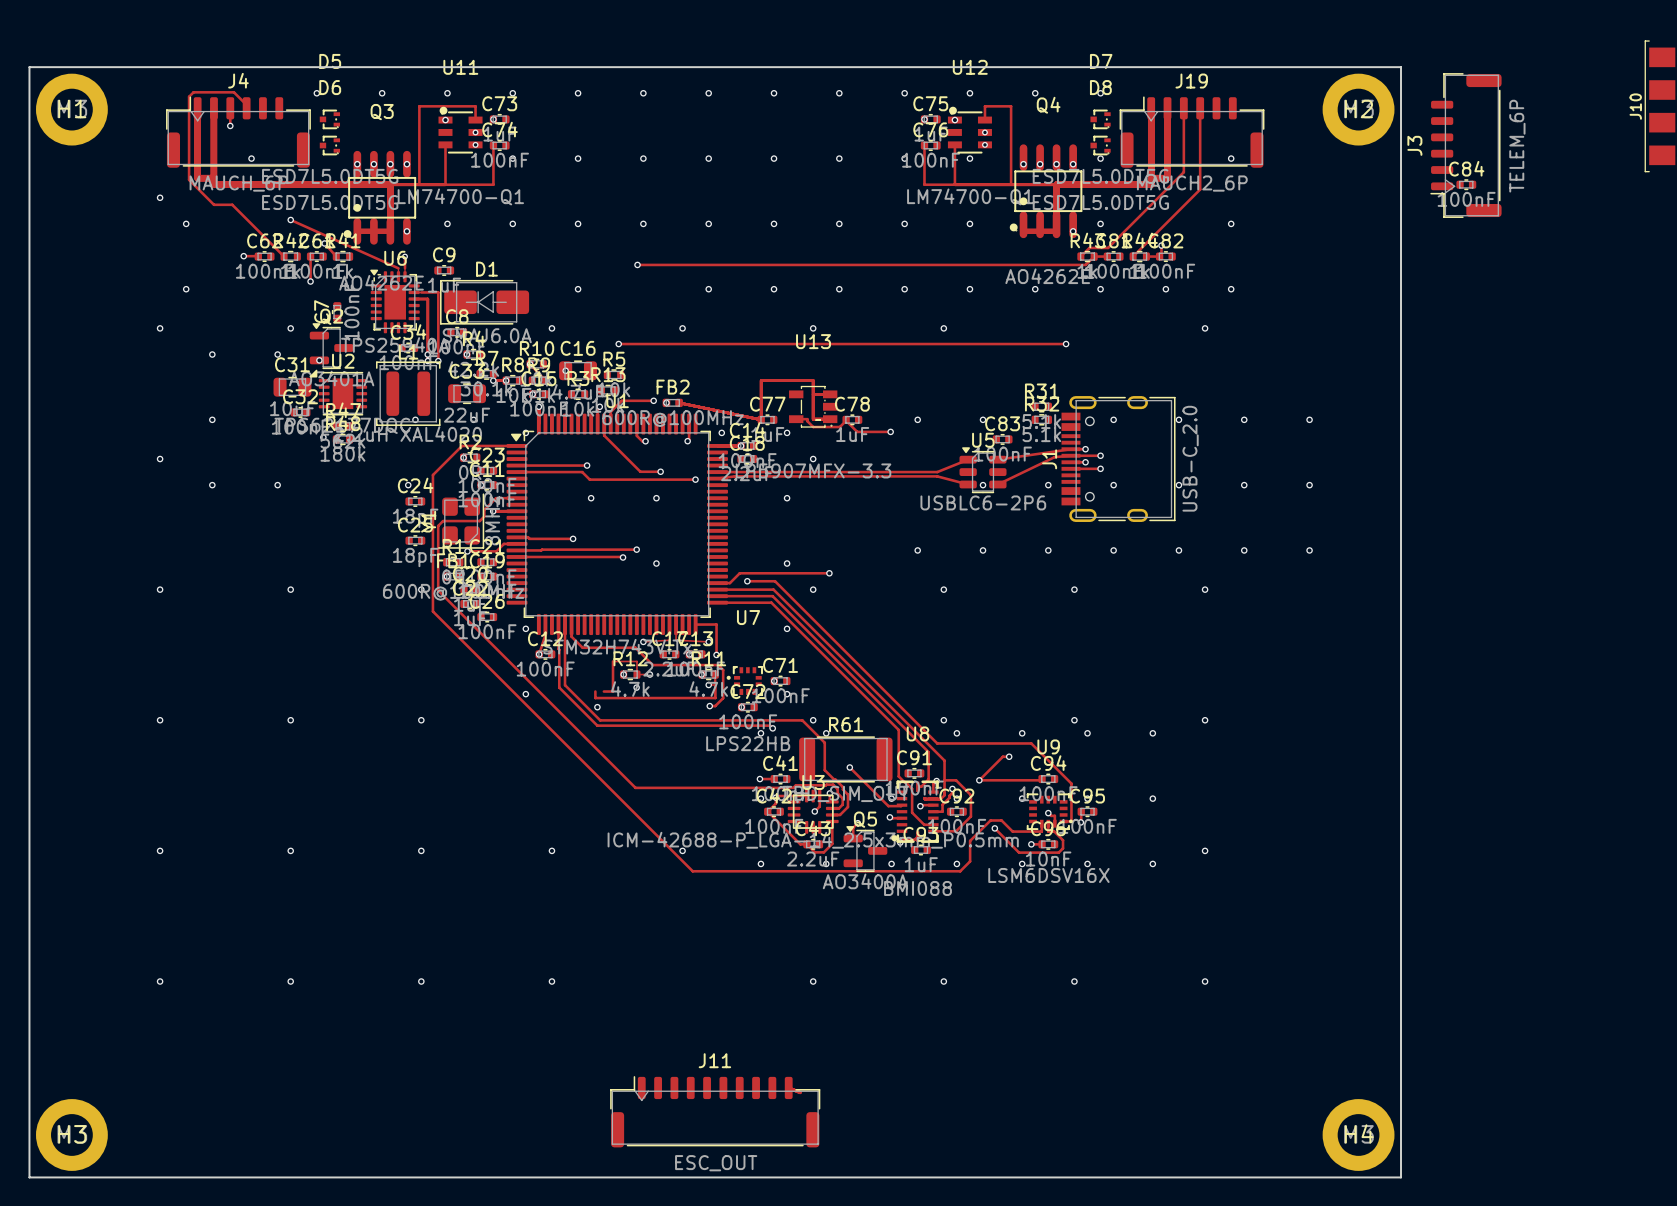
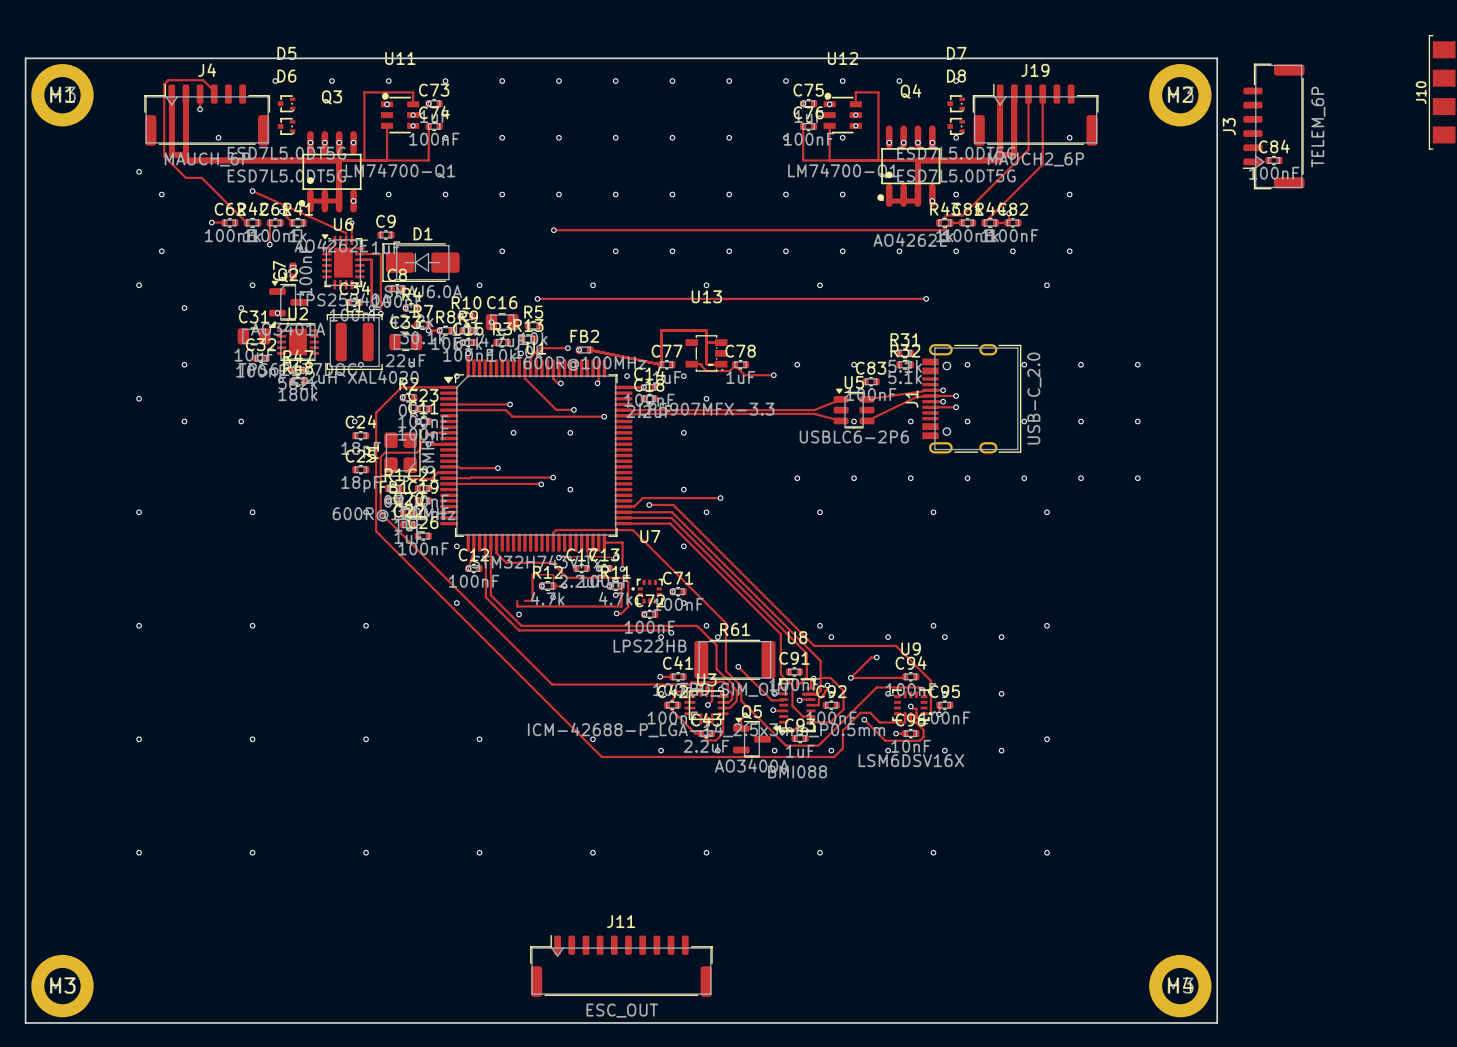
track: none -> (553, 542) (553, 532) (556, 530) (632, 530) (726, 623) (726, 671) (741, 686) (741, 700) (786, 745) (818, 745) (876, 687) (919, 687) (924, 691) (924, 696)
via: none -> (593, 852)
track: (788, 1087) (800, 1092) -> none

